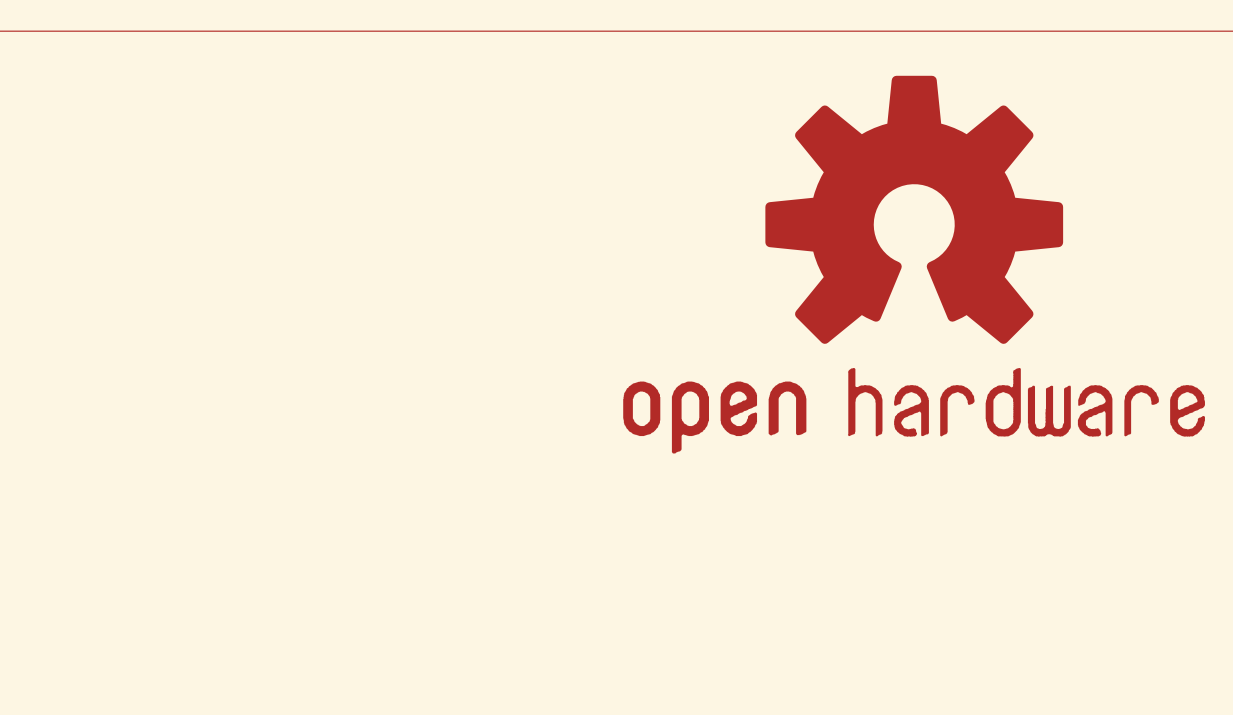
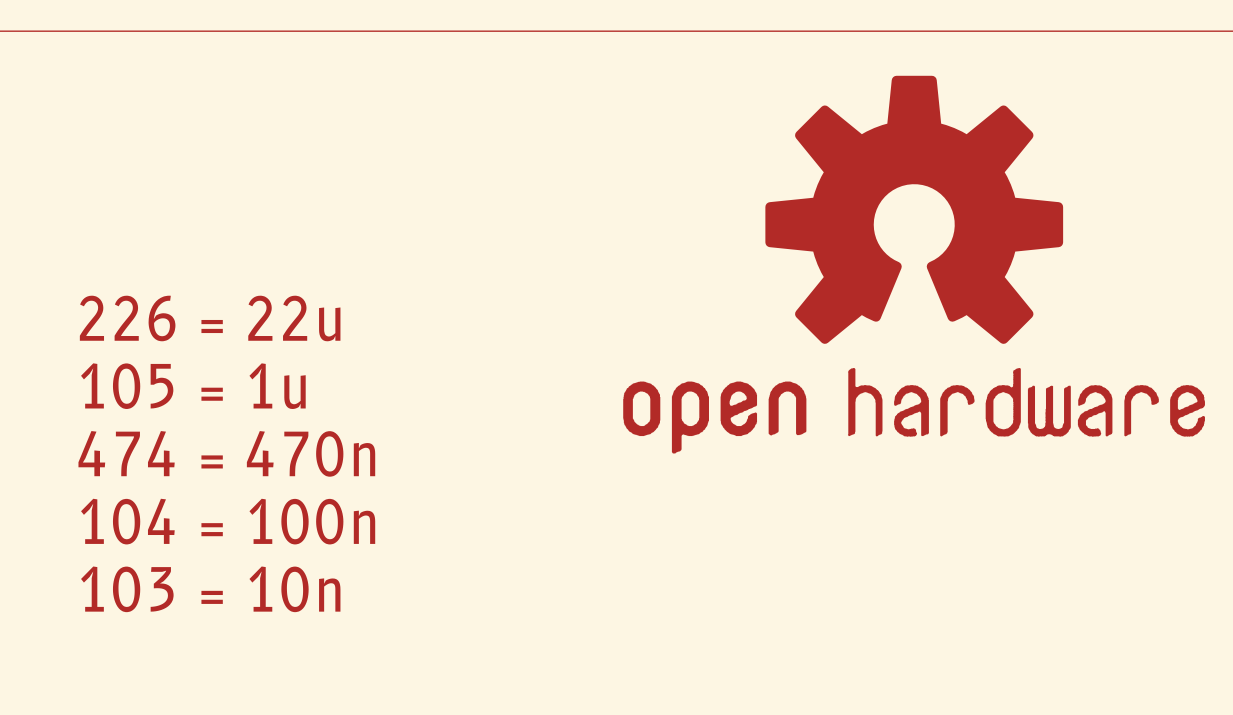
text: none -> 226 = 22u (210, 318)
text: none -> 105 = 1u (193, 386)
text: none -> 474 = 470n (226, 453)
text: none -> 104 = 100n (228, 521)
text: none -> 103 = 10n (210, 589)

